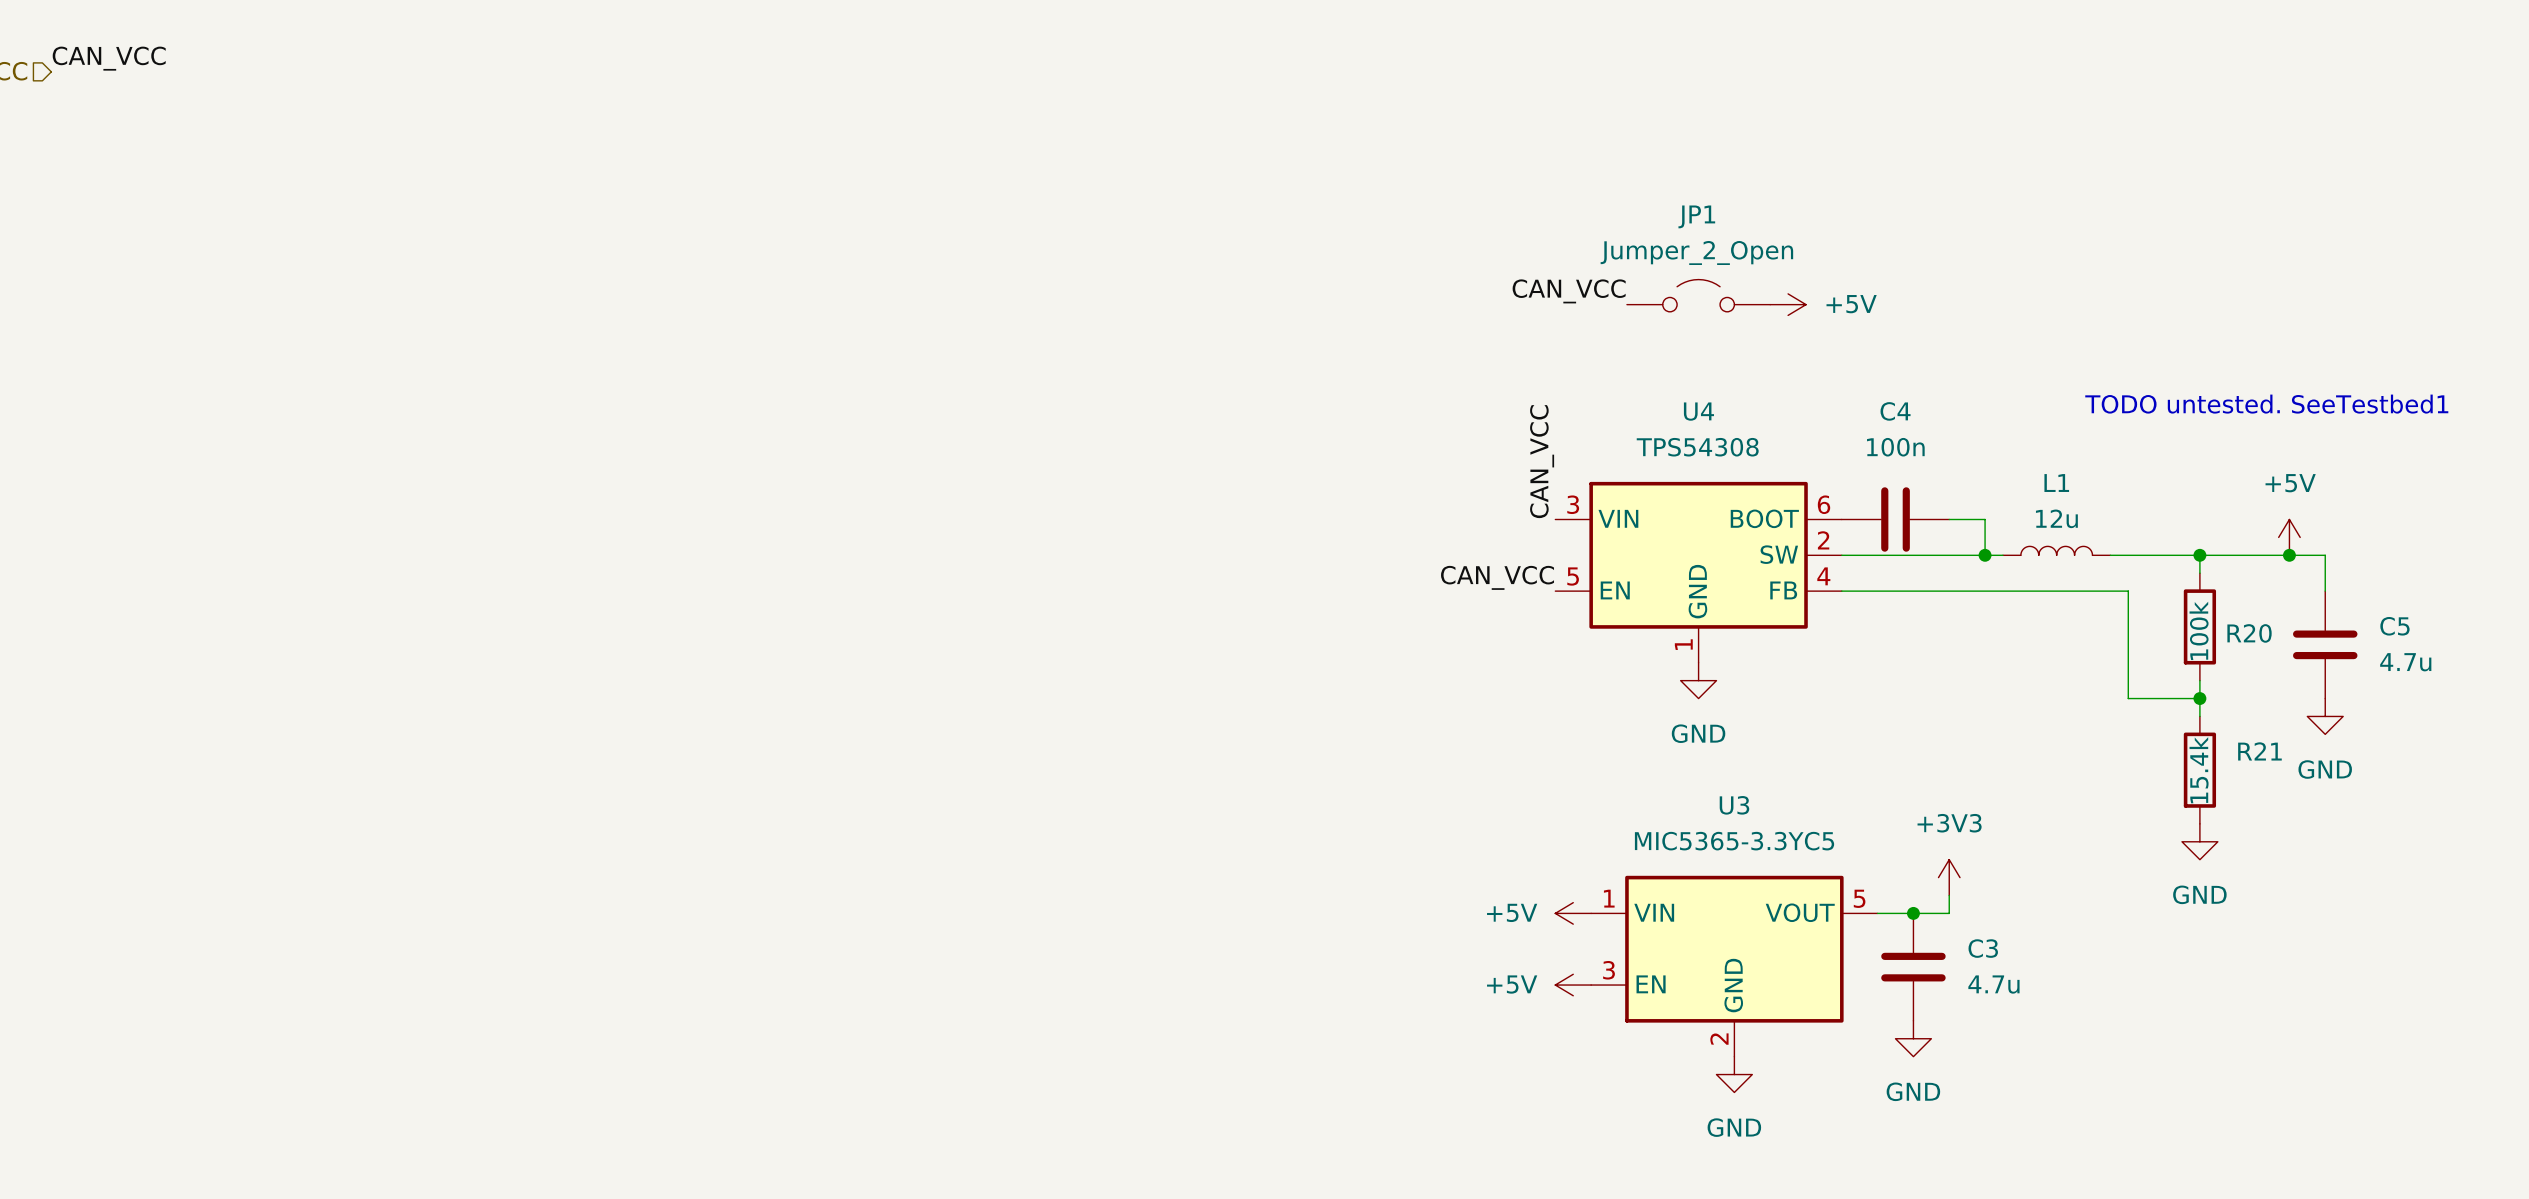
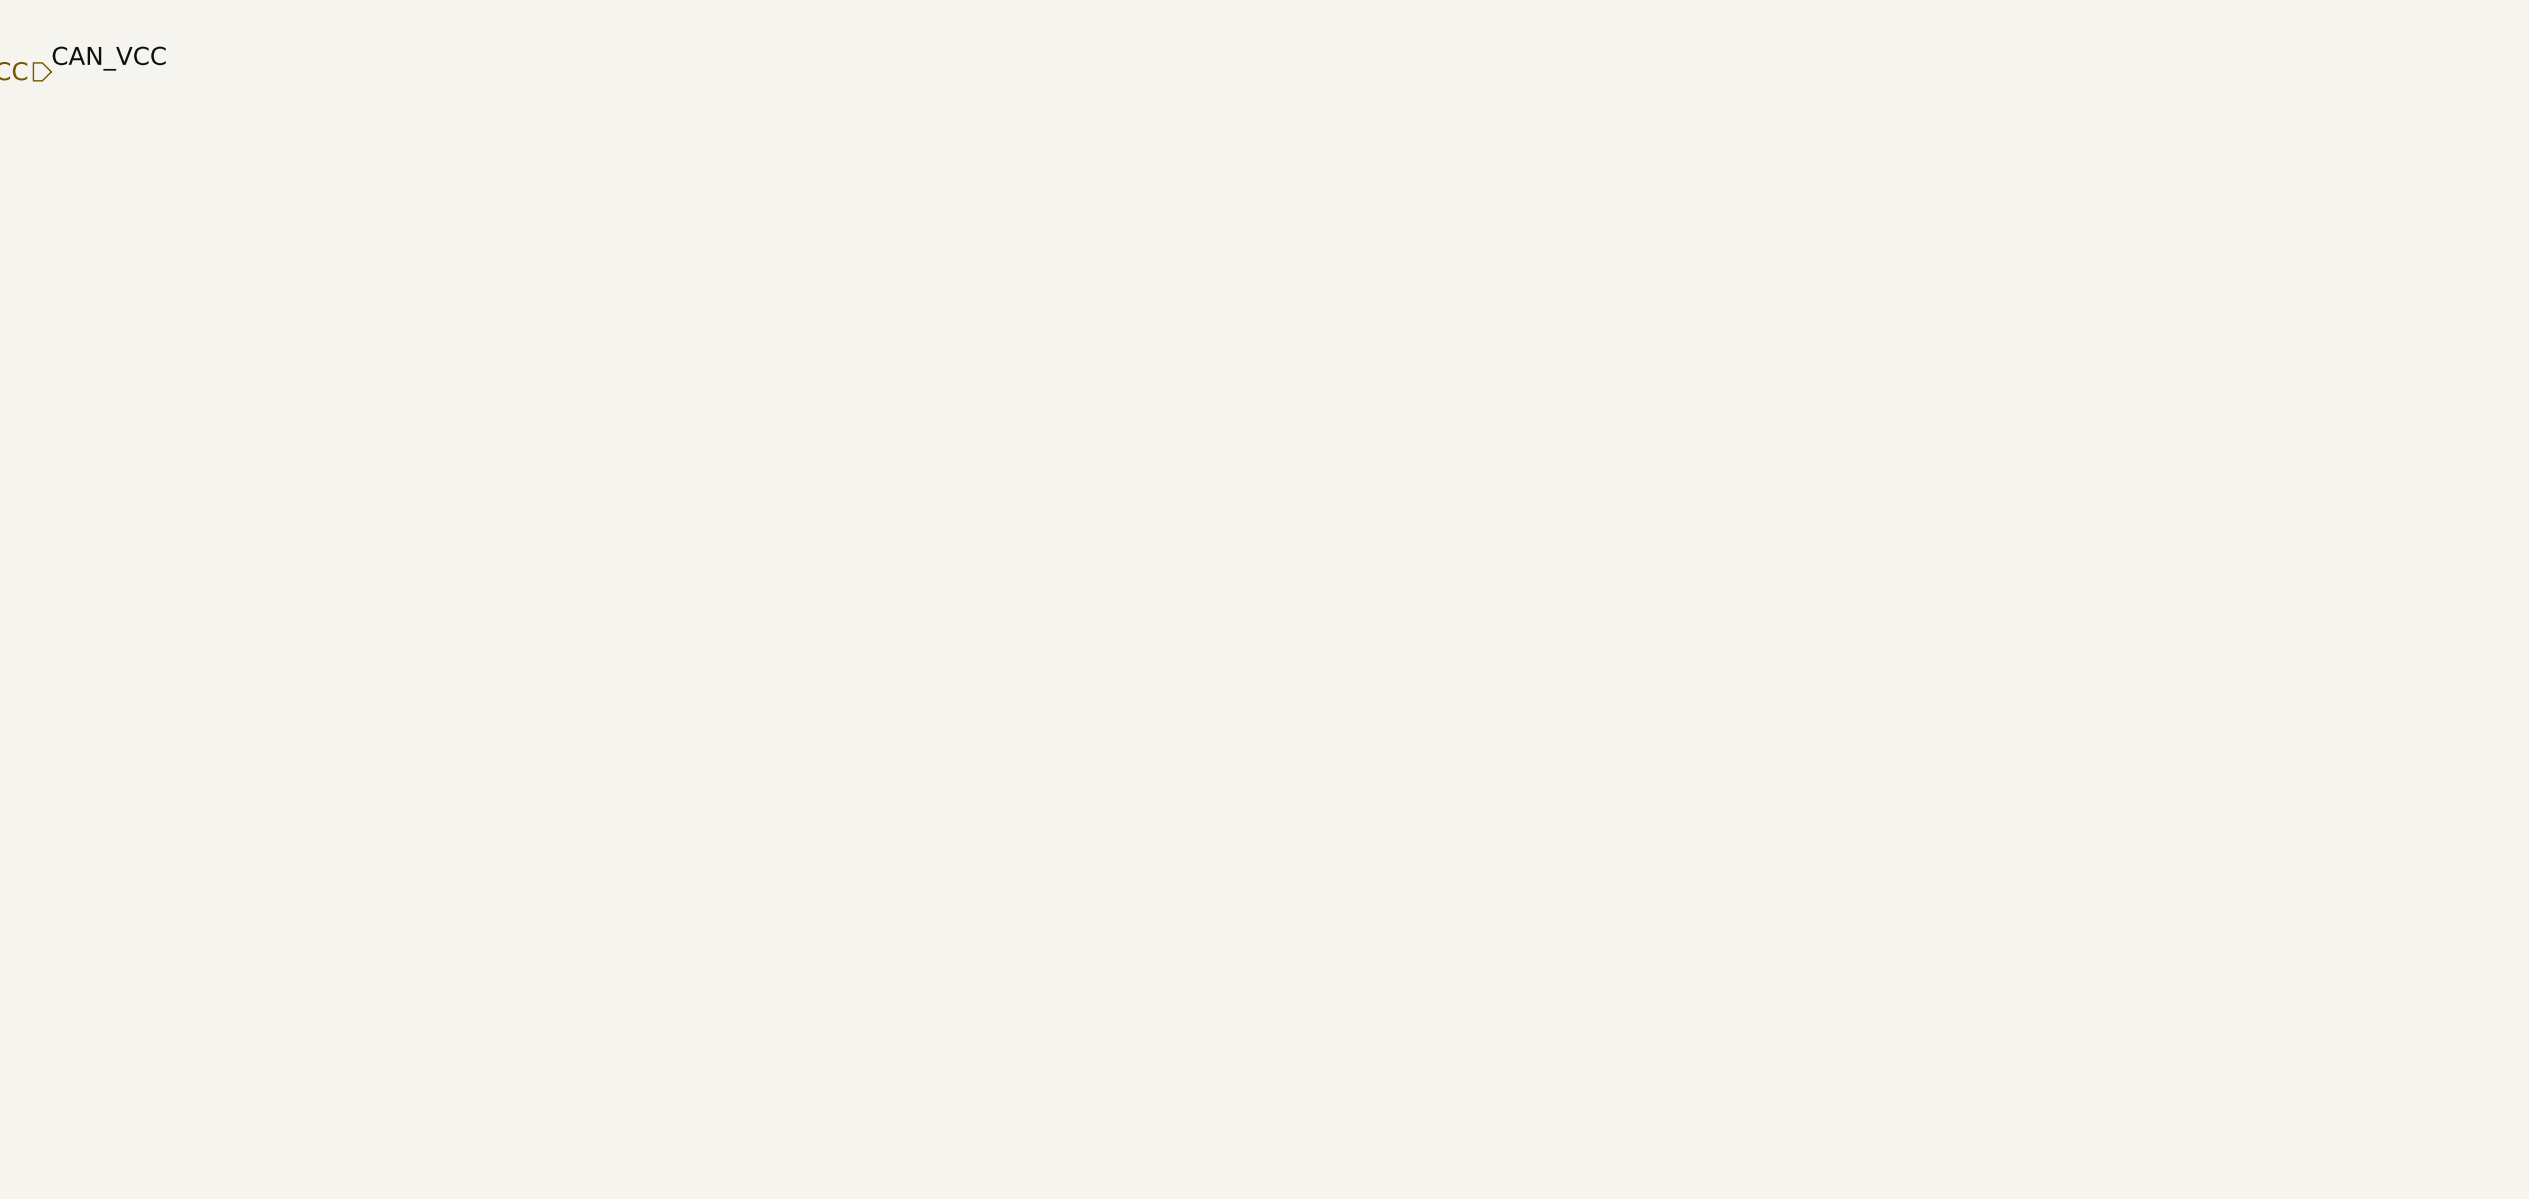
label: CAN_VCC (1569, 291) -> none
JP1: Jumper_2_Open (1698, 295) -> none
power symbol: +5V (1788, 304) -> none
text: TODO untested. SeeTestbed1 (2266, 404) -> none
label: CAN_VCC (1542, 461) -> none
C4: 100n (1895, 519) -> none
wire: (1949, 519) (1985, 519) (1985, 555) -> none
power symbol: +5V (2289, 537) -> none
L1: 12u (2056, 550) -> none
wire: (1841, 555) (2002, 555) -> none
junction: (1985, 555) -> none
wire: (2110, 555) (2325, 555) (2325, 591) -> none
wire: (2199, 555) (2199, 573) -> none
junction: (2199, 555) -> none
junction: (2289, 555) -> none
U4: TPS54308 (1698, 572) -> none
label: CAN_VCC (1497, 577) -> none
wire: (1841, 591) (2128, 591) (2128, 698) (2199, 698) -> none
R20: 100k (2199, 626) -> none
C5: 4.7u (2325, 644) -> none
power symbol: GND (1698, 680) -> none
wire: (2199, 680) (2199, 716) -> none
junction: (2199, 698) -> none
power symbol: GND (2325, 716) -> none
R21: 15.4k (2199, 770) -> none
power symbol: GND (2199, 841) -> none
power symbol: +3V3 (1949, 877) -> none
wire: (1949, 895) (1949, 913) (1877, 913) -> none
power symbol: +5V (1573, 913) -> none
junction: (1913, 913) -> none
U3: MIC5365-3.3YC5 (1734, 966) -> none
C3: 4.7u (1913, 967) -> none
power symbol: +5V (1573, 985) -> none
power symbol: GND (1913, 1038) -> none
power symbol: GND (1734, 1074) -> none

